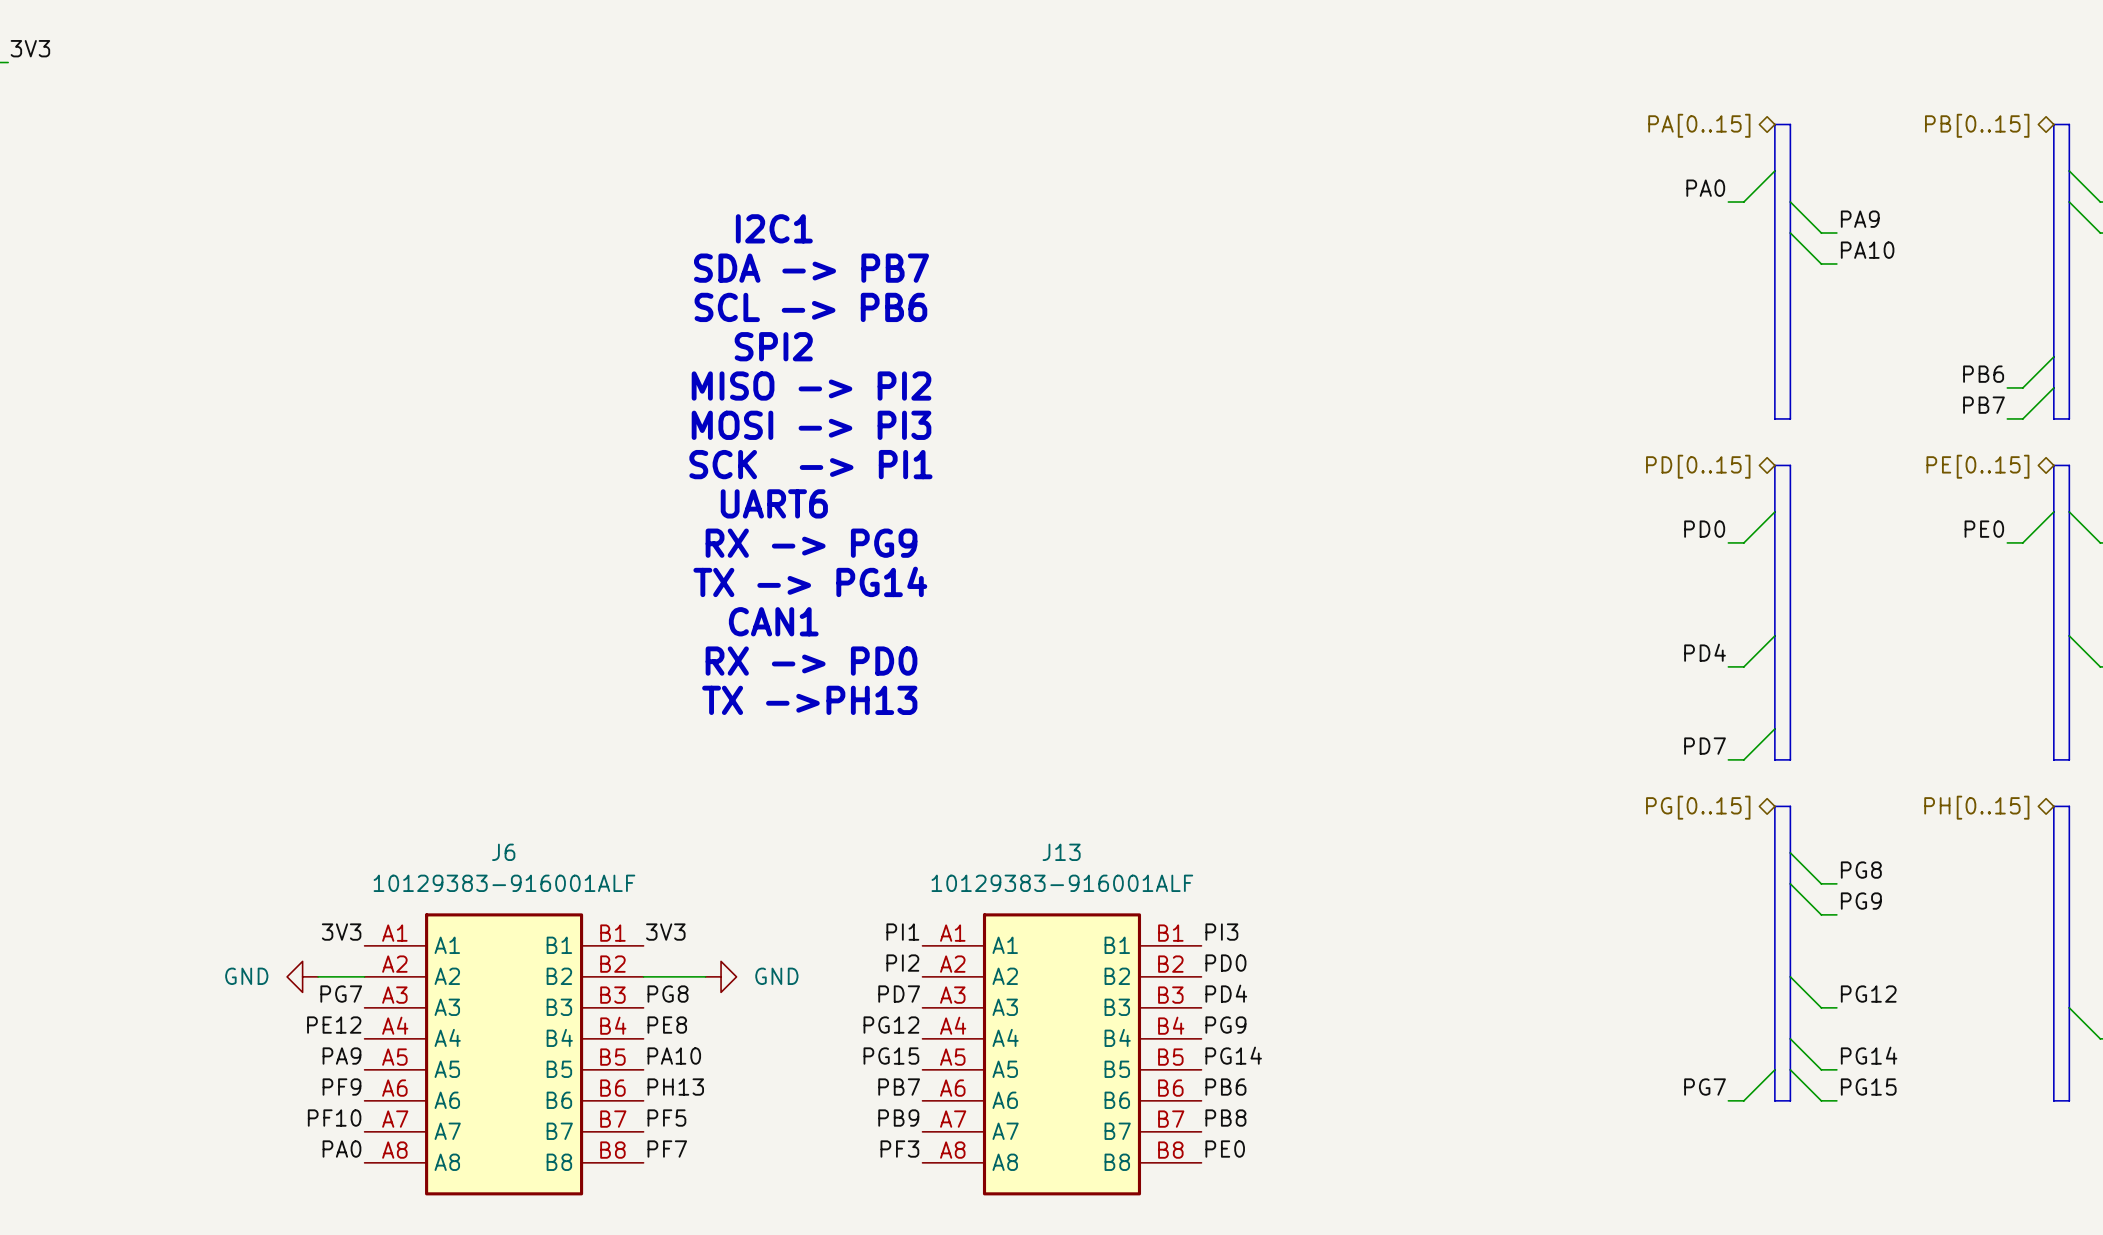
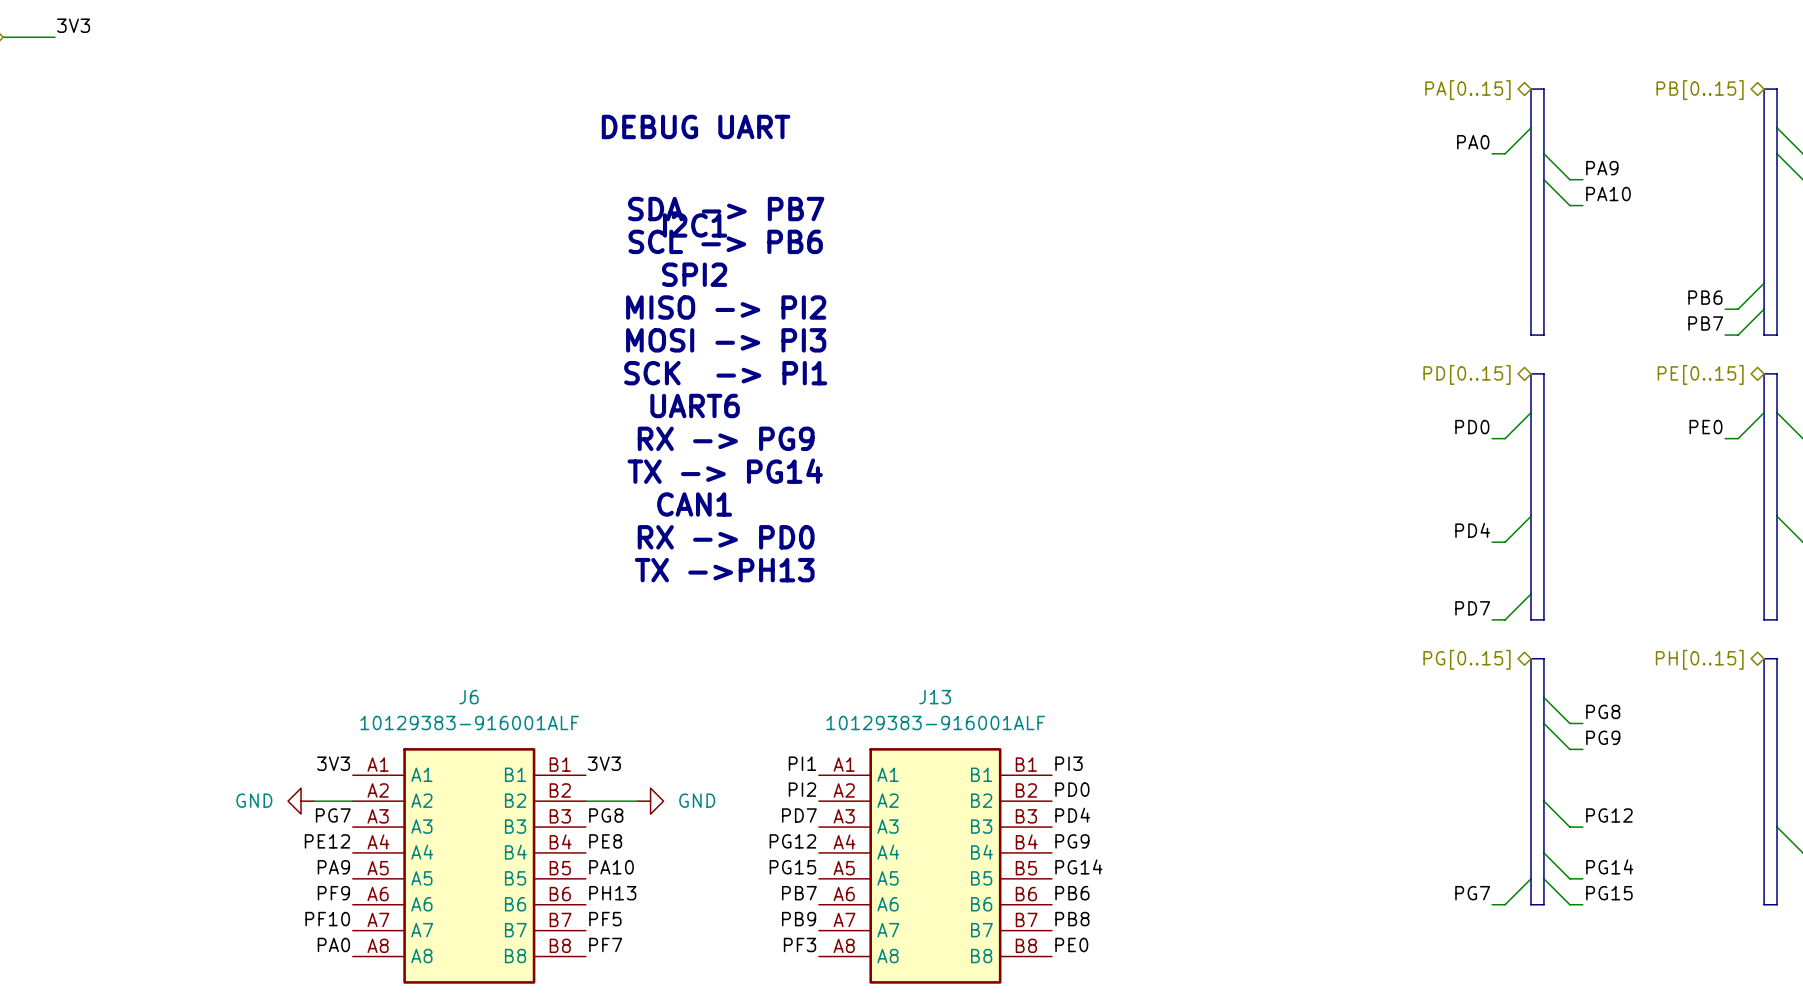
text: none -> DEBUG UART (696, 126)
text position: I2C1 (774, 228) -> I2C1 (695, 225)

